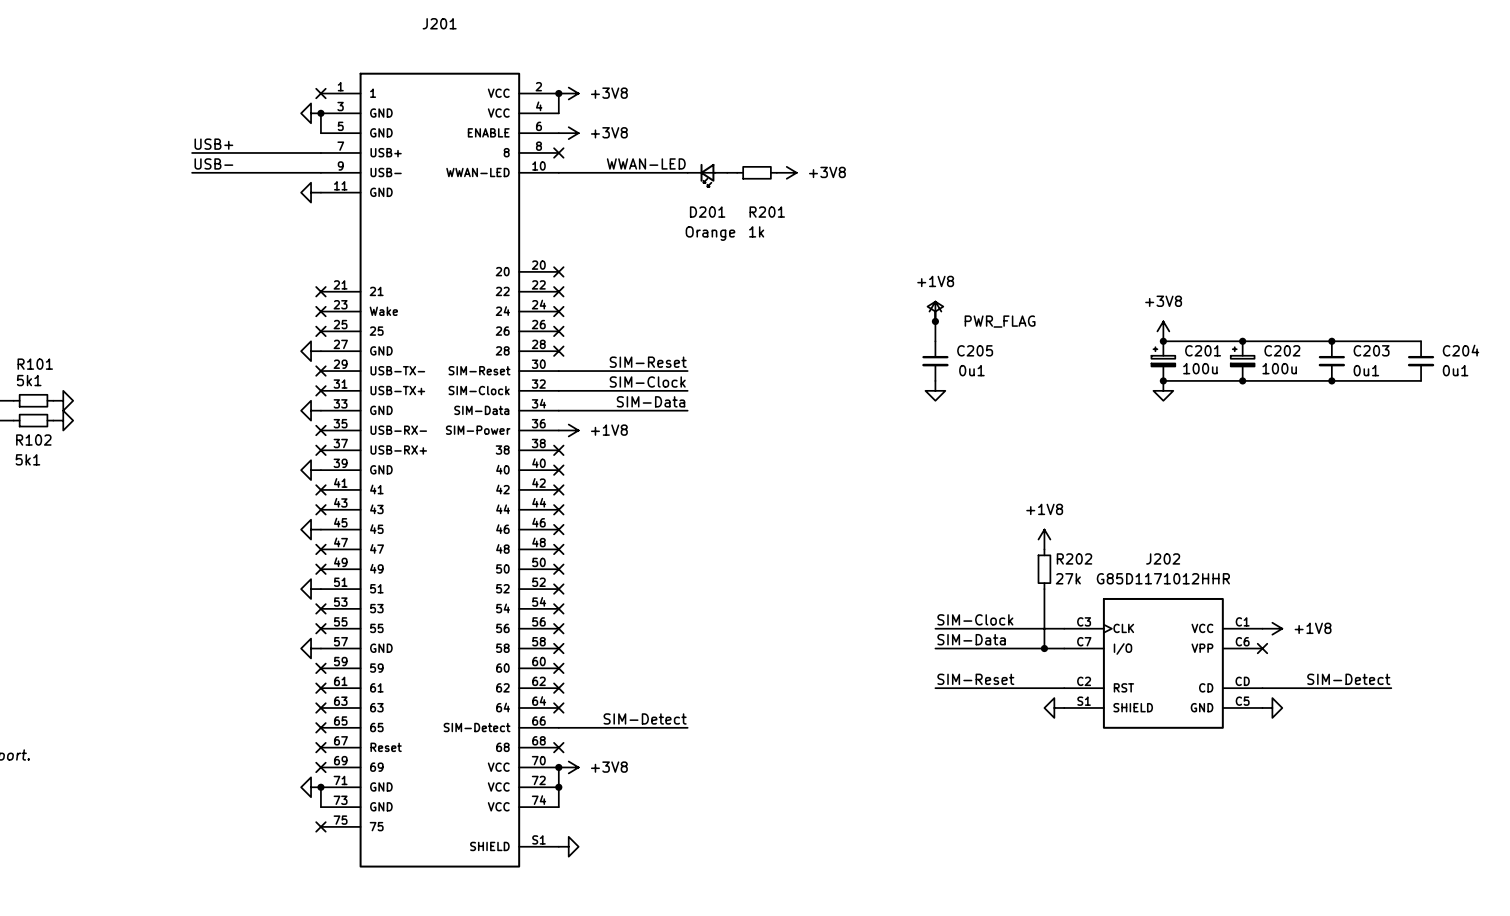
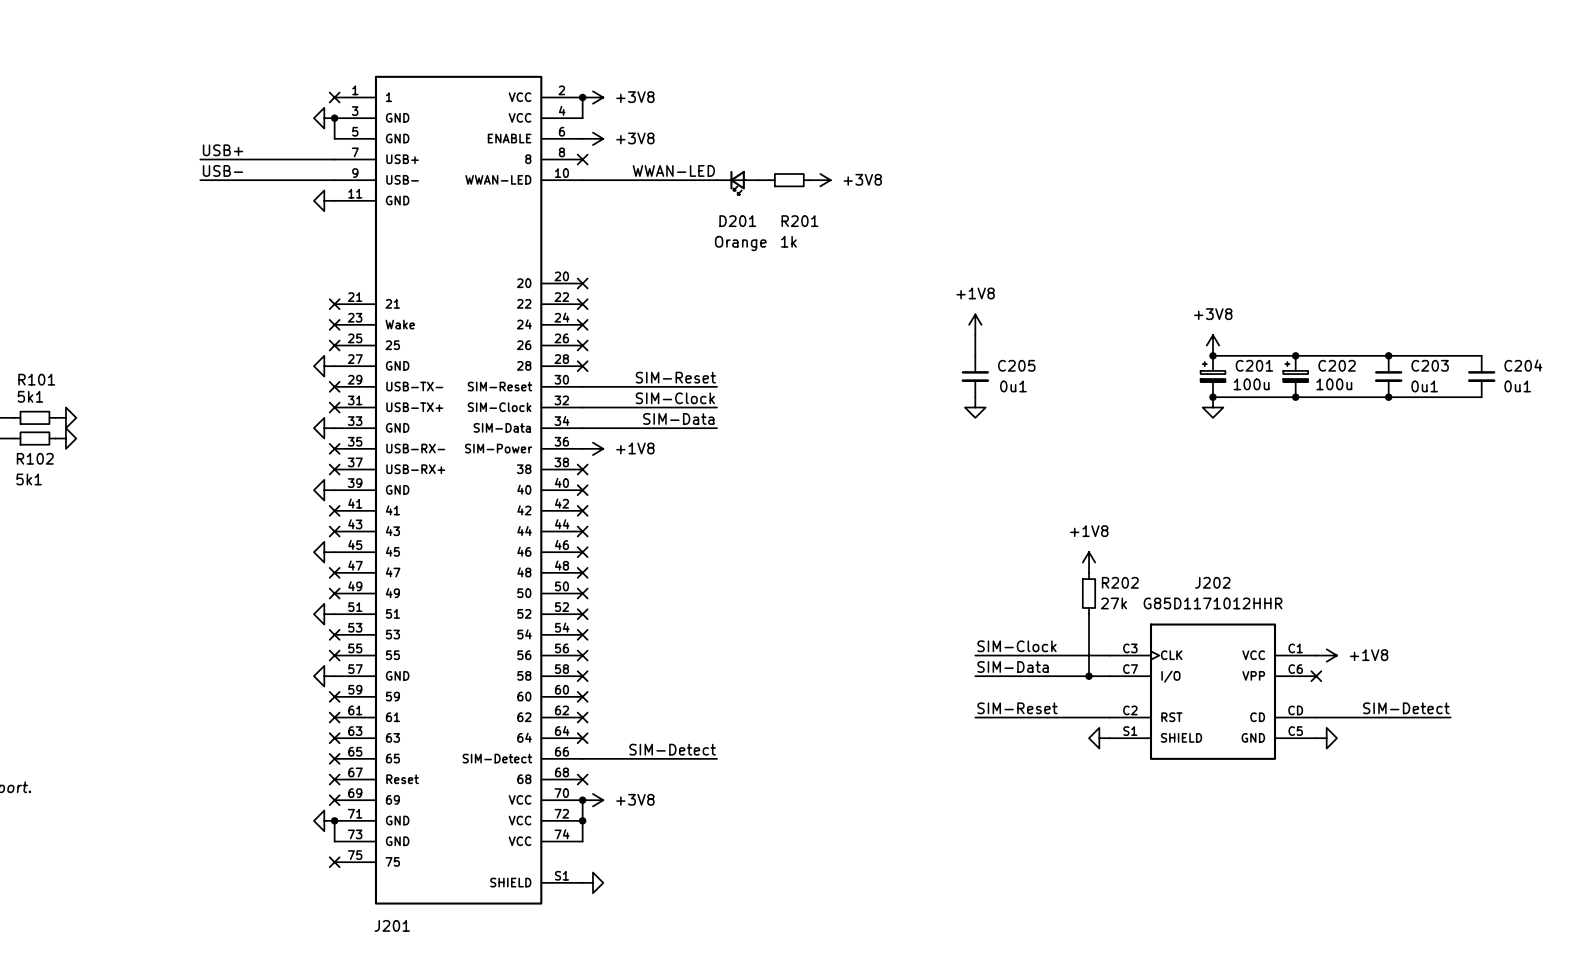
J201 name position: J201 (439, 23) -> J201 (392, 925)
power symbol: PWR_FLAG (935, 311) -> none
junction: (935, 321) -> none

